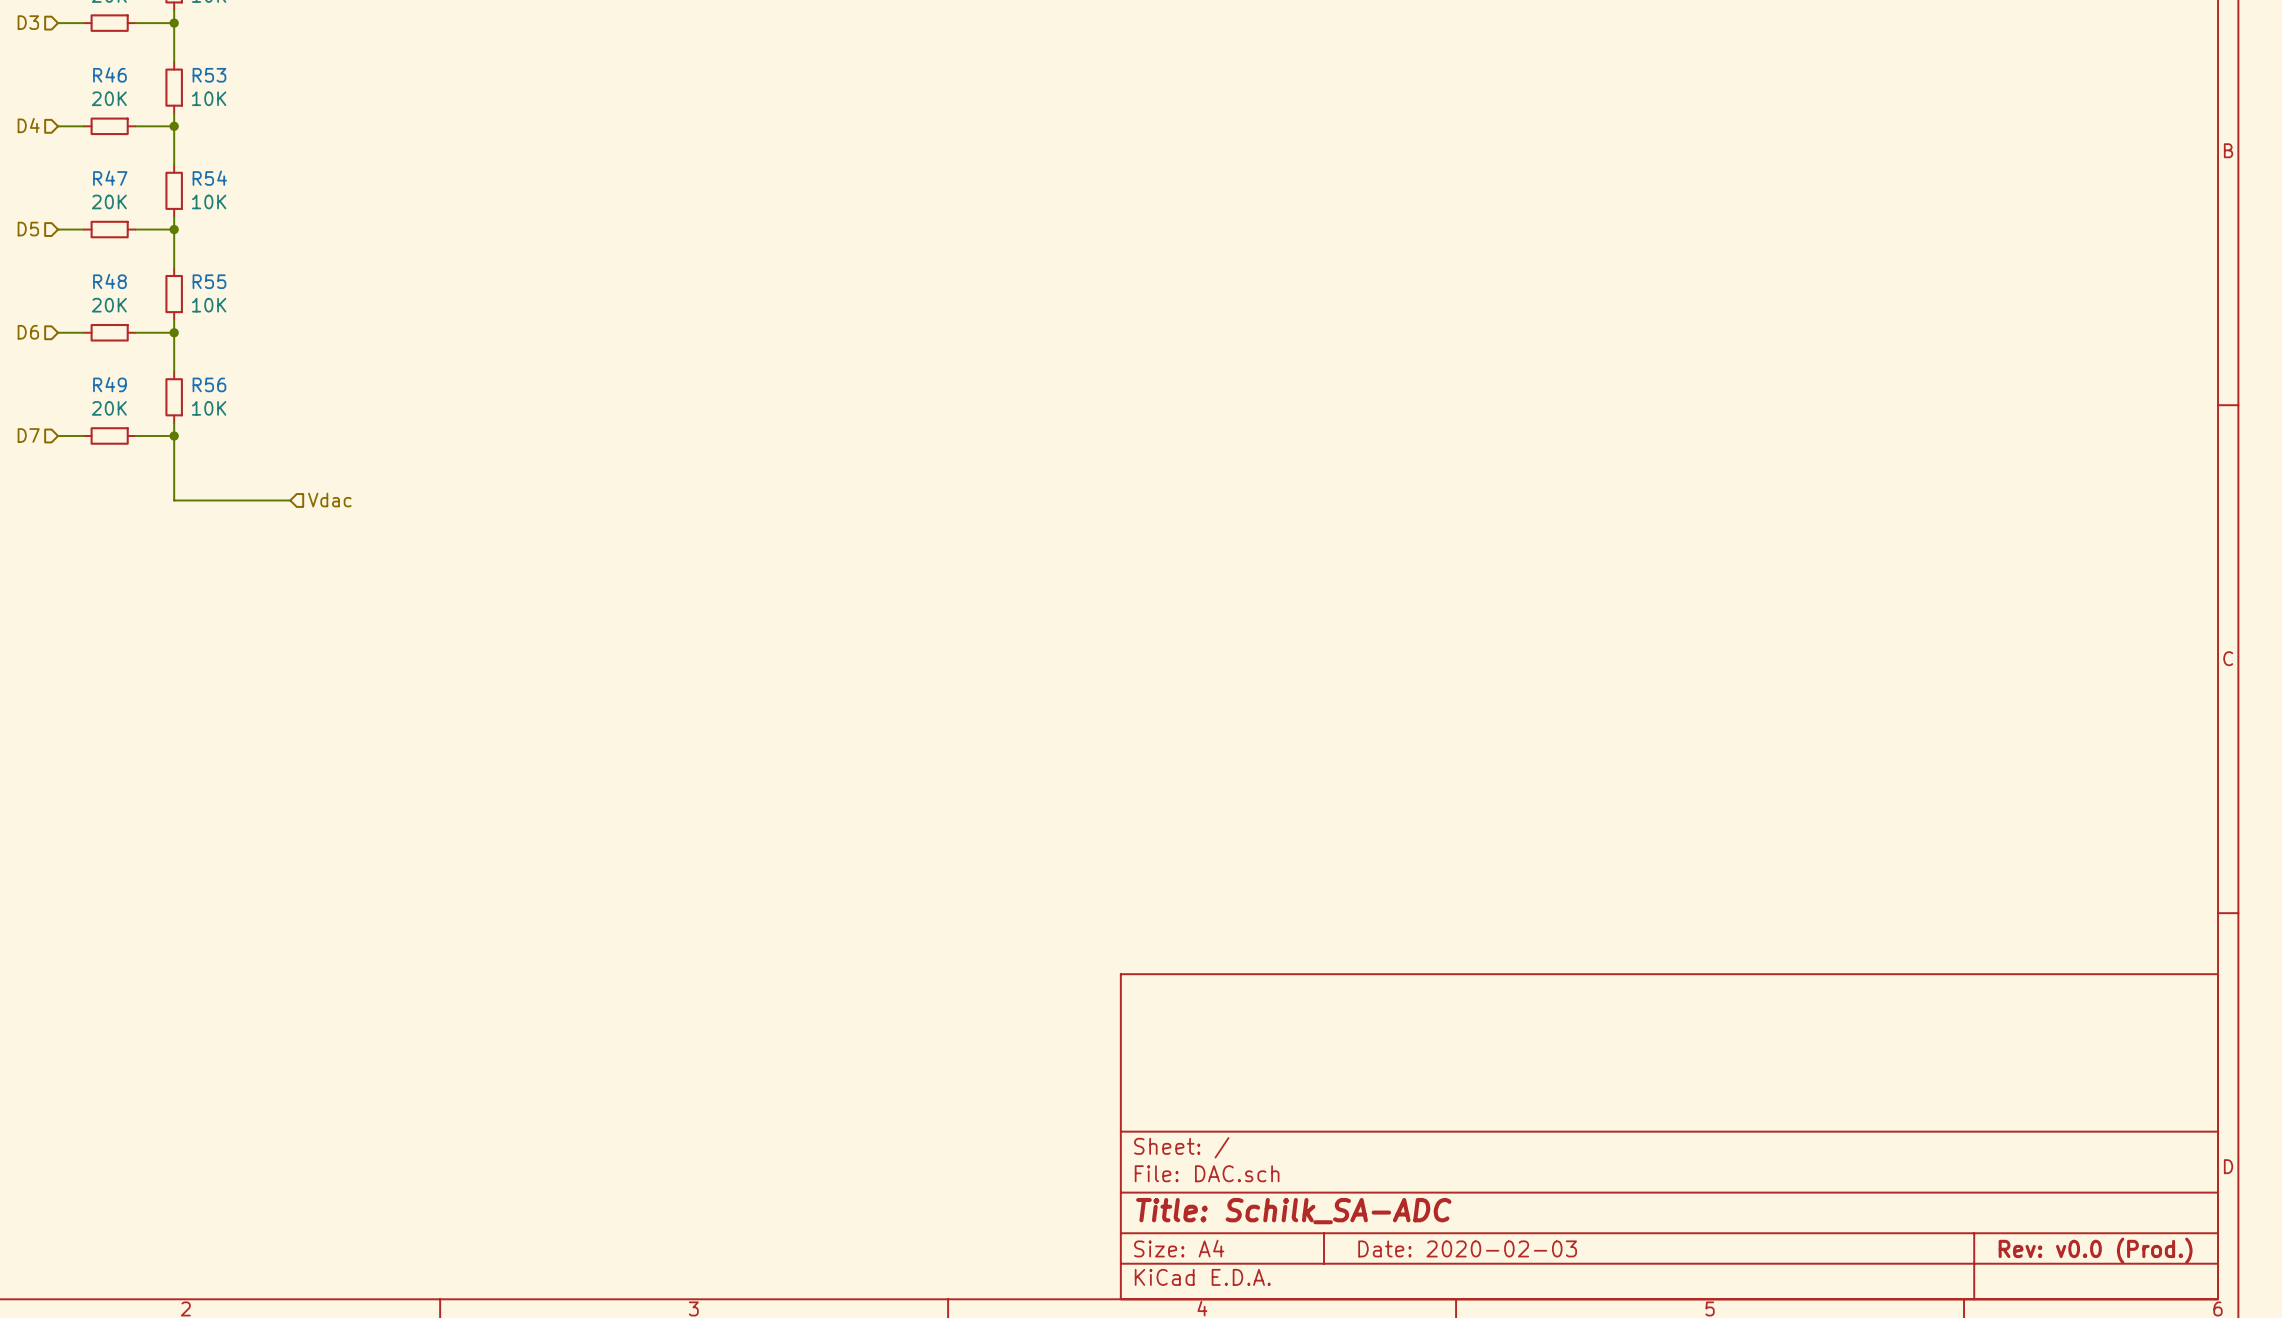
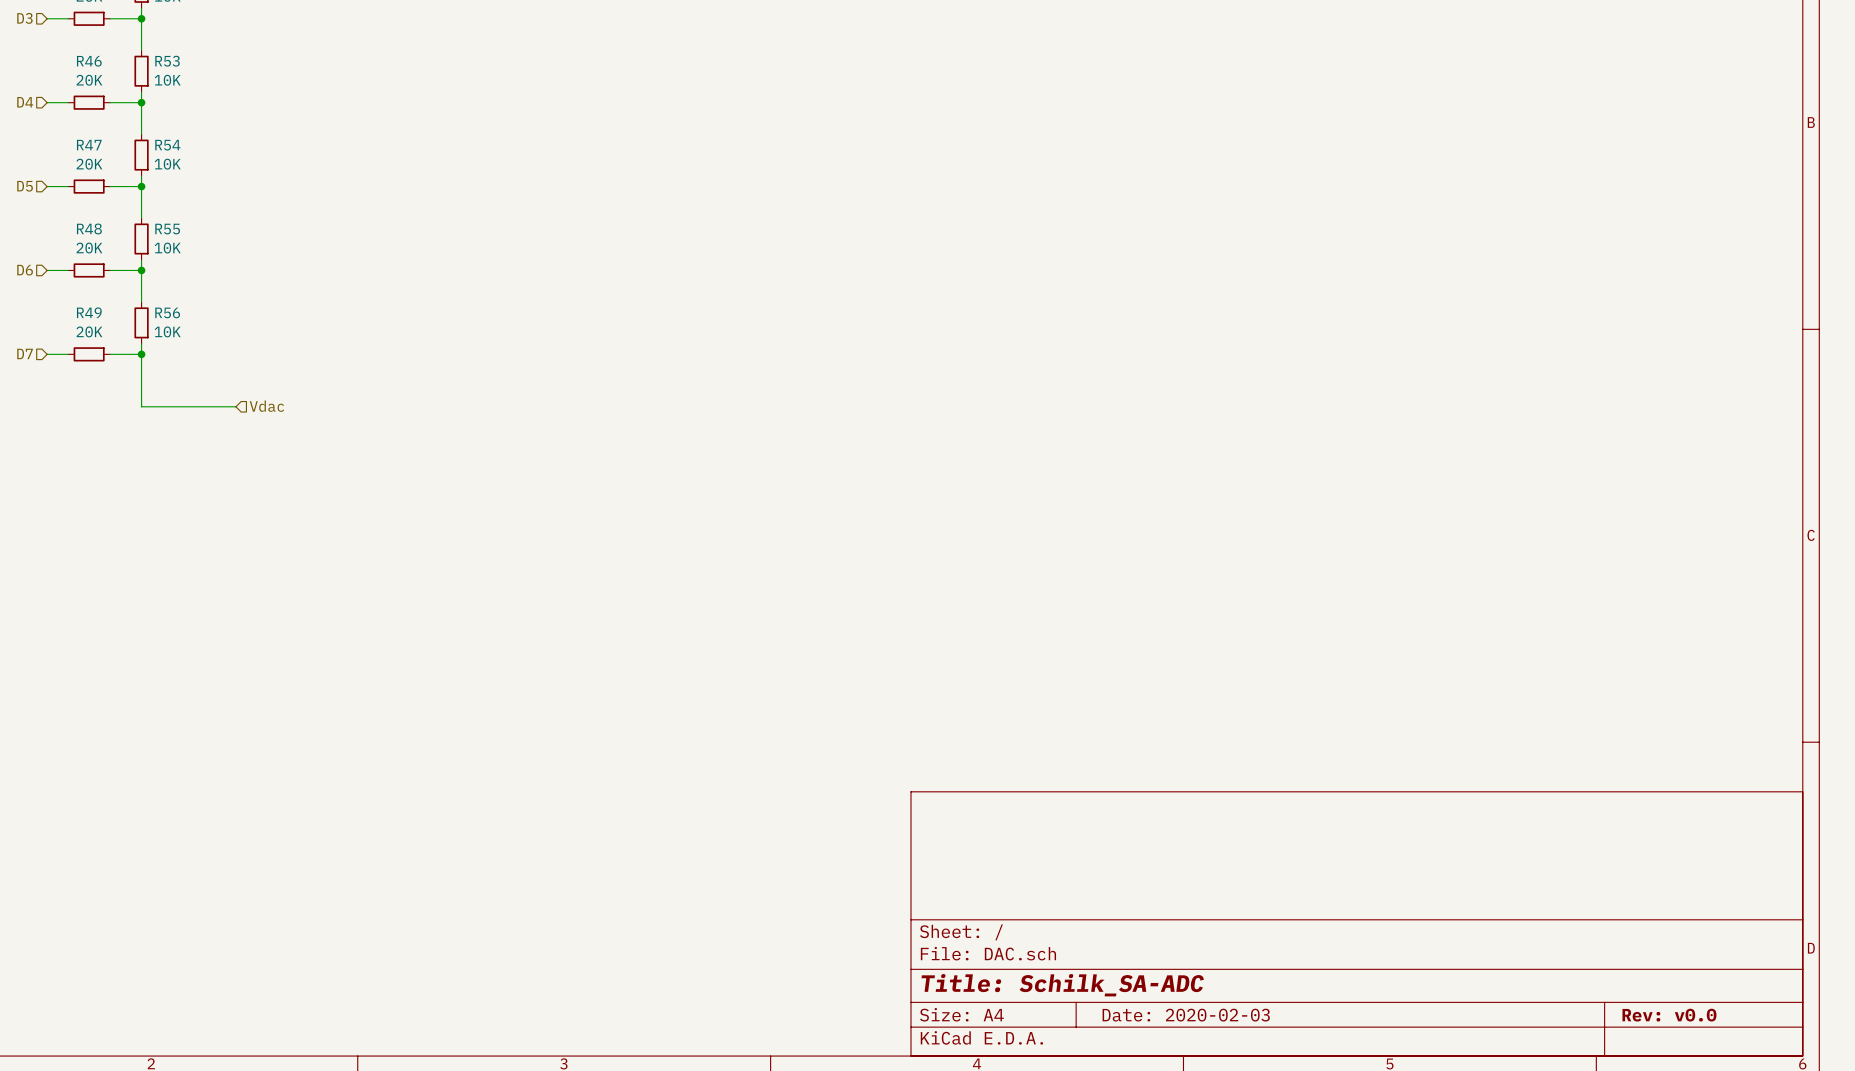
title block: Rev: v0.0 (Prod.) (2095, 1250) -> Rev: v0.0 (1669, 1015)

